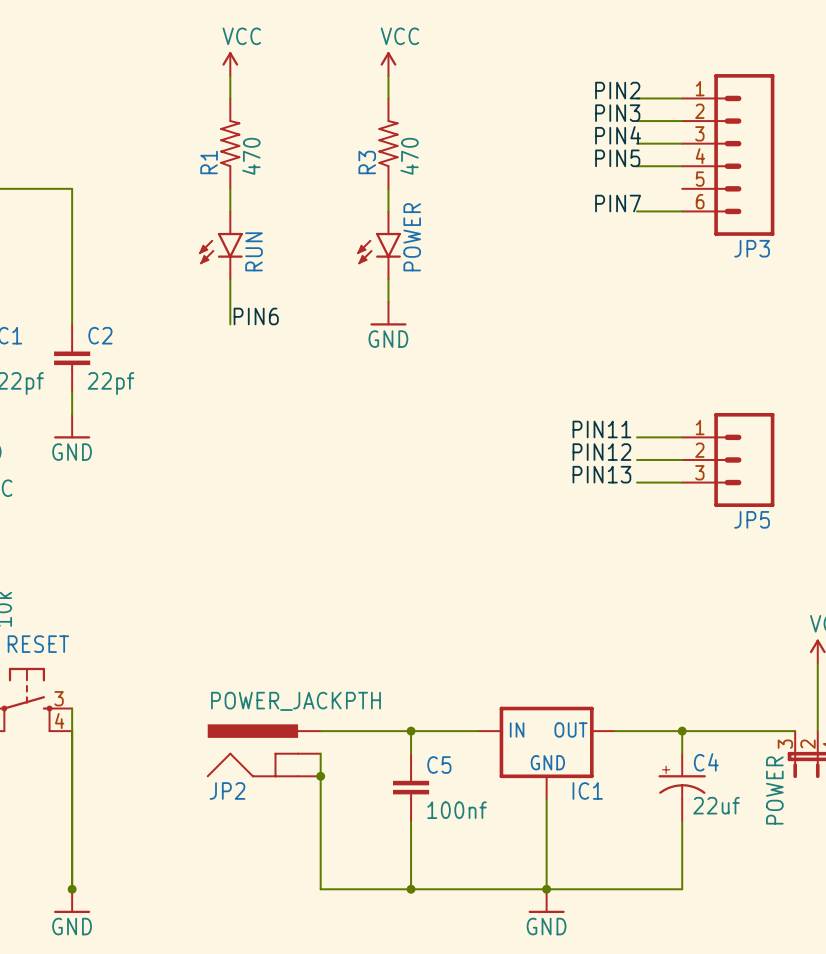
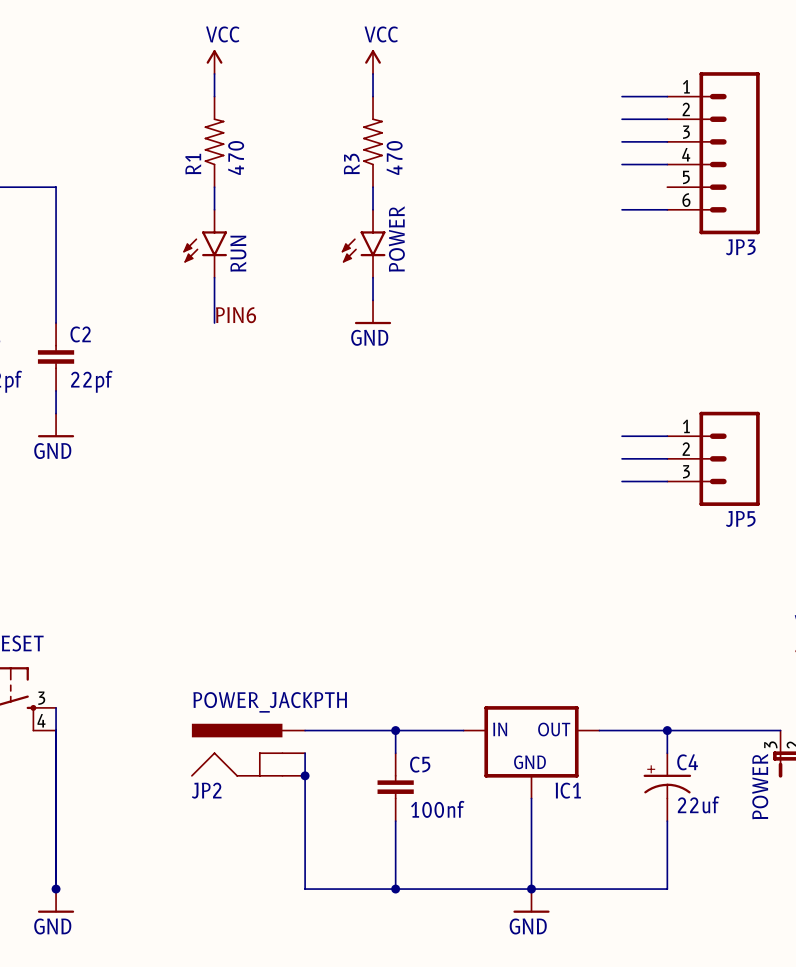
label: PIN2 (617, 90) -> none
label: PIN3 (617, 113) -> none
label: PIN4 (618, 135) -> none
label: PIN5 (617, 158) -> none
label: PIN7 (618, 203) -> none
label: PIN11 (601, 429) -> none
label: PIN12 (601, 452) -> none
label: PIN13 (601, 474) -> none

